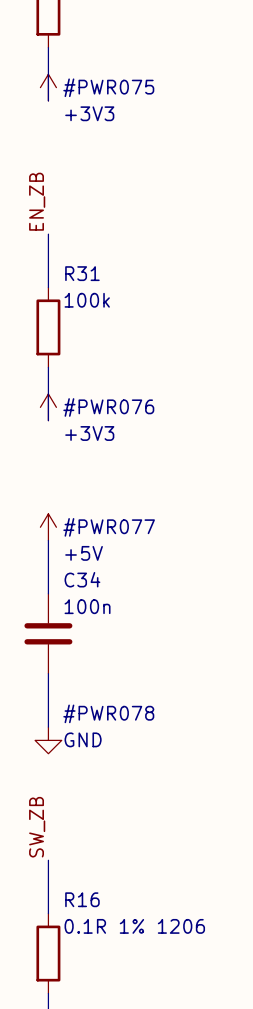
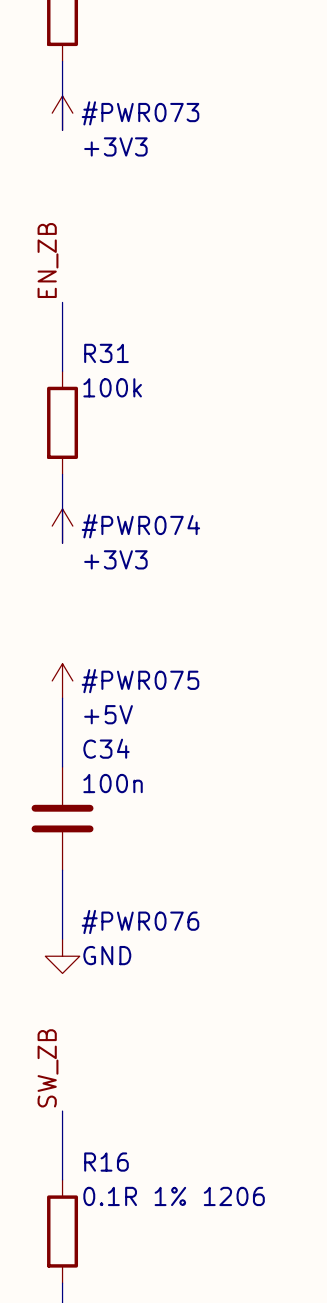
#PWR075 name: #PWR075 (108, 87) -> #PWR073 (140, 113)
#PWR076 name: #PWR076 (108, 407) -> #PWR074 (140, 526)
#PWR077 name: #PWR077 (109, 527) -> #PWR075 (140, 681)
#PWR078 name: #PWR078 (108, 713) -> #PWR076 (140, 921)

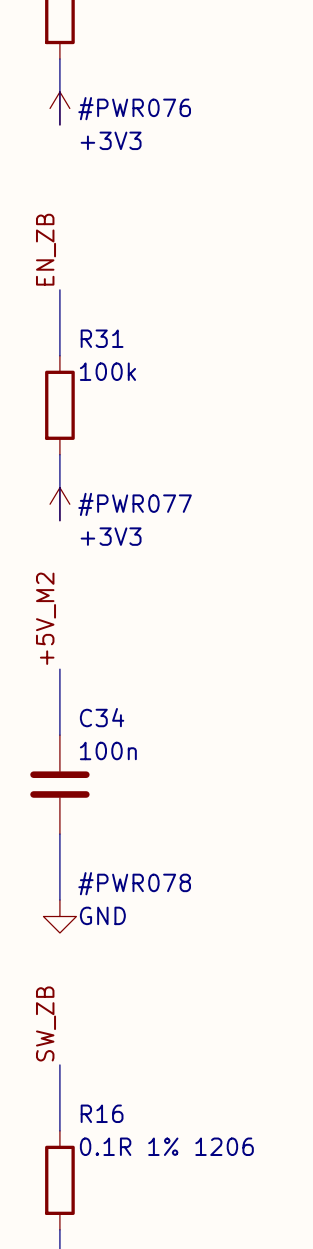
#PWR073 name: #PWR073 (140, 113) -> #PWR076 (134, 108)
#PWR074 name: #PWR074 (140, 526) -> #PWR077 (135, 504)
label: none -> +5V_M2 (46, 618)
#PWR075: +5V (62, 680) -> none
#PWR076 name: #PWR076 (140, 921) -> #PWR078 (134, 883)

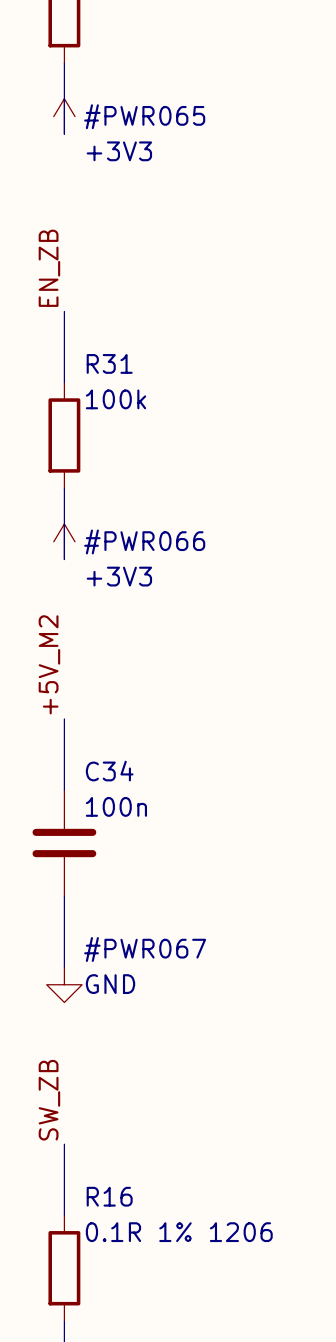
#PWR076 name: #PWR076 (134, 108) -> #PWR065 (144, 116)
#PWR077 name: #PWR077 (135, 504) -> #PWR066 (144, 541)
#PWR078 name: #PWR078 (134, 883) -> #PWR067 (145, 949)

